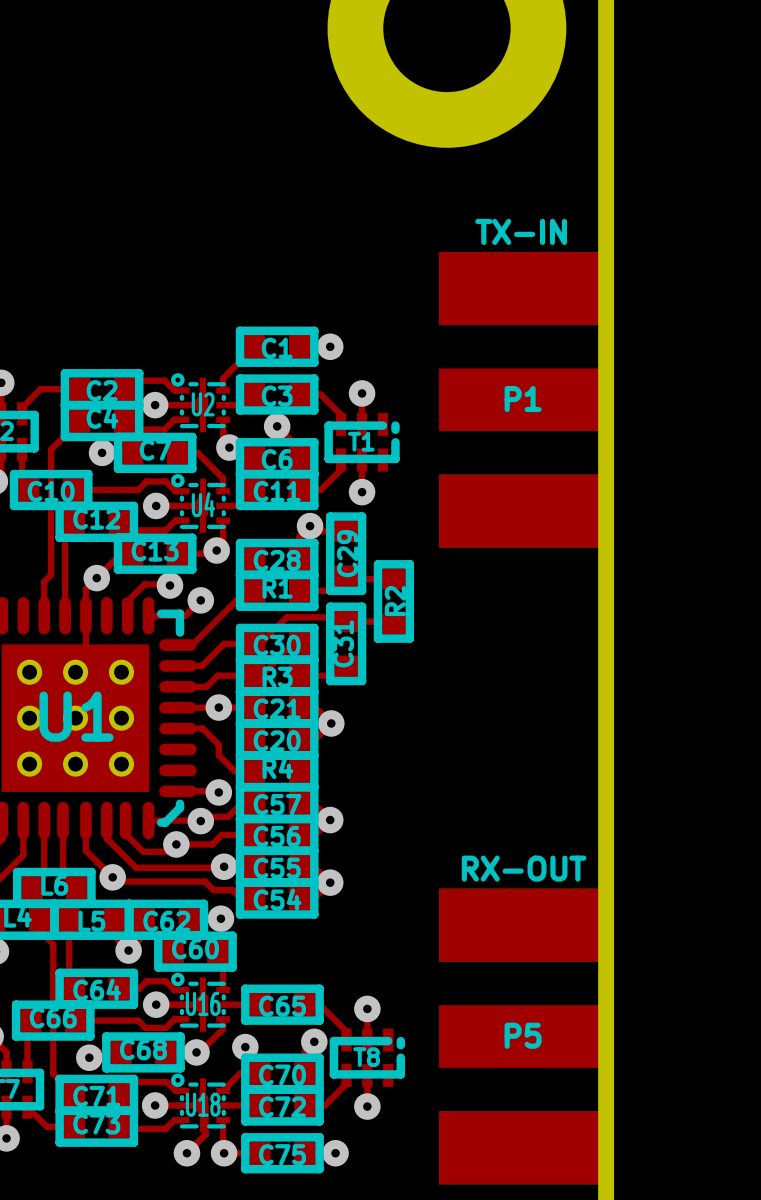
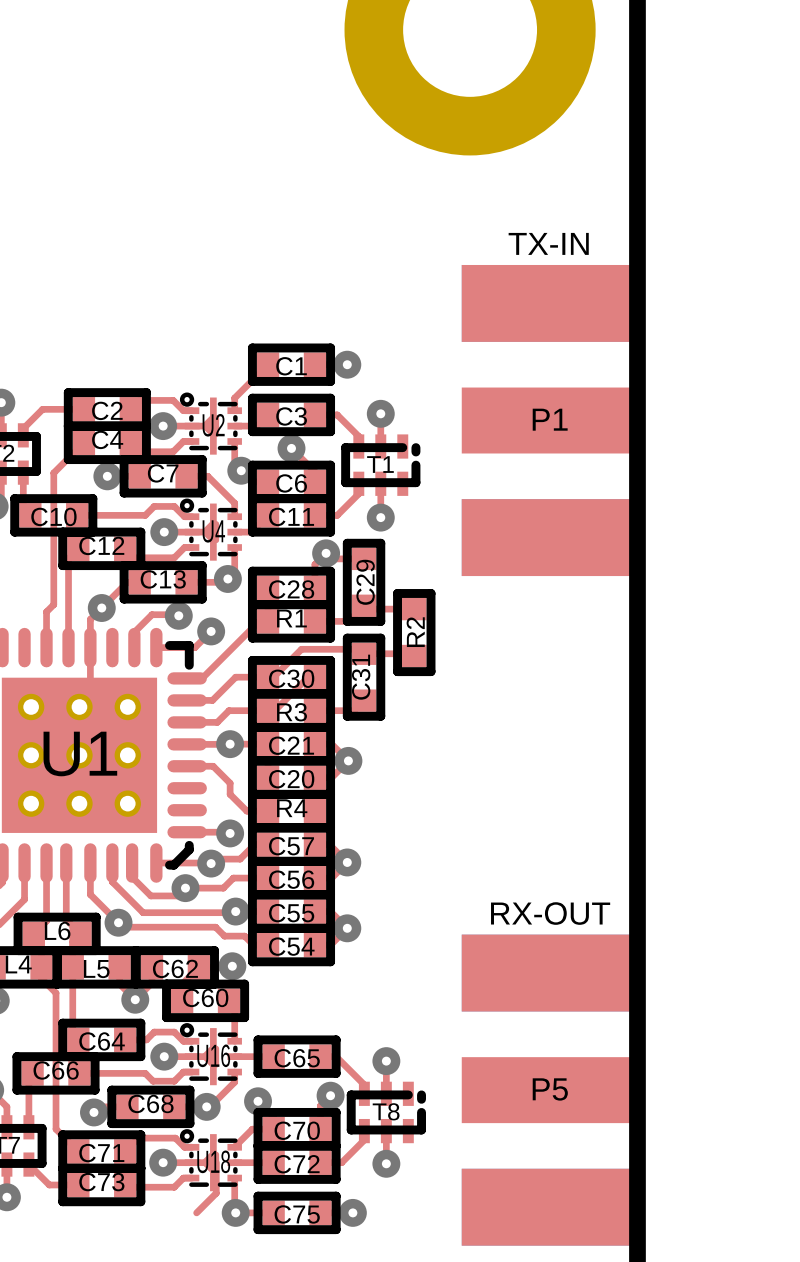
via: (186, 1153) -> none

